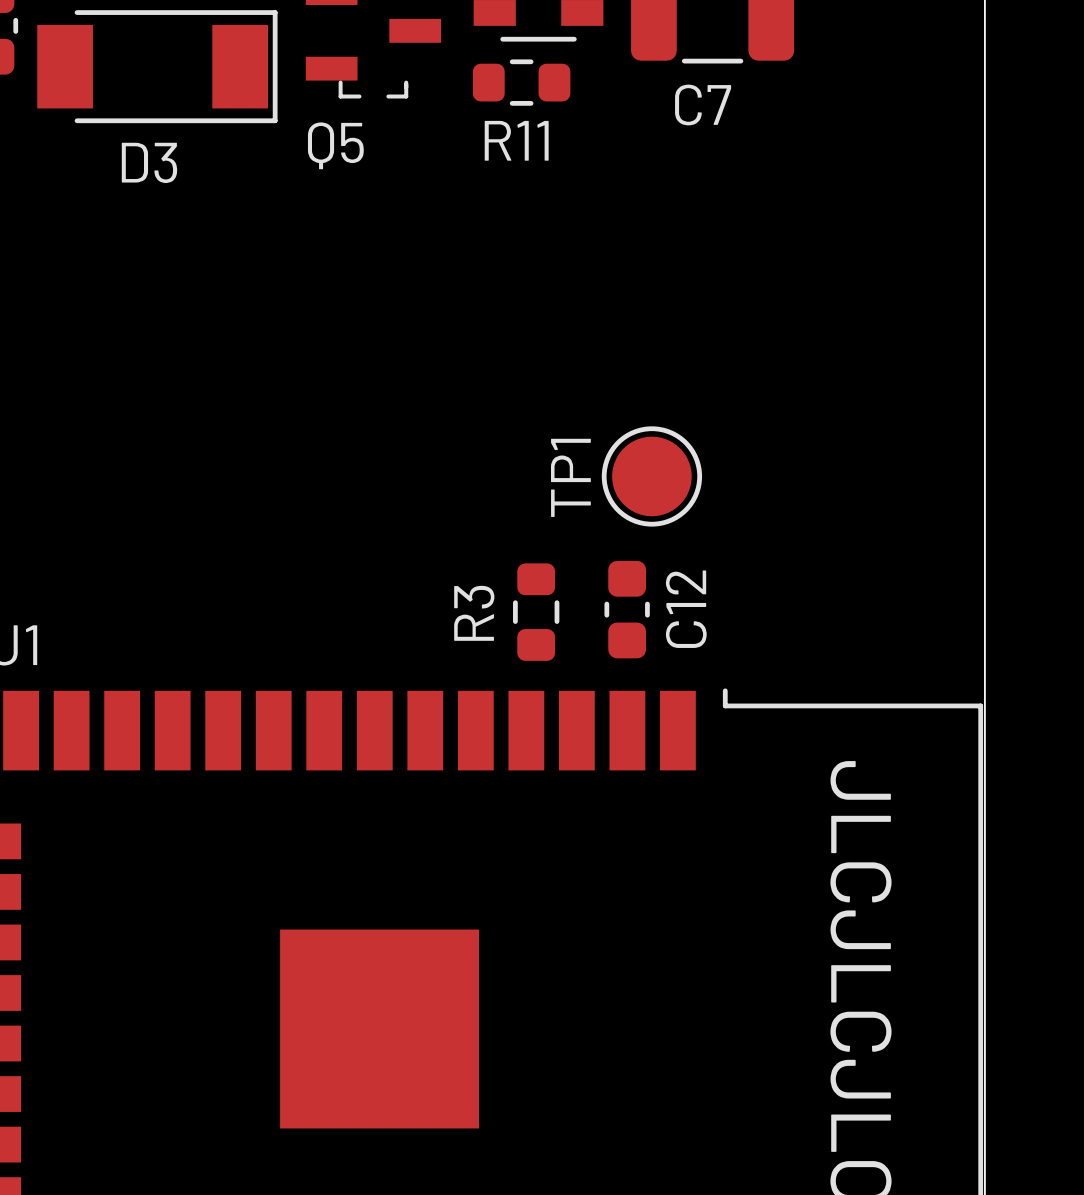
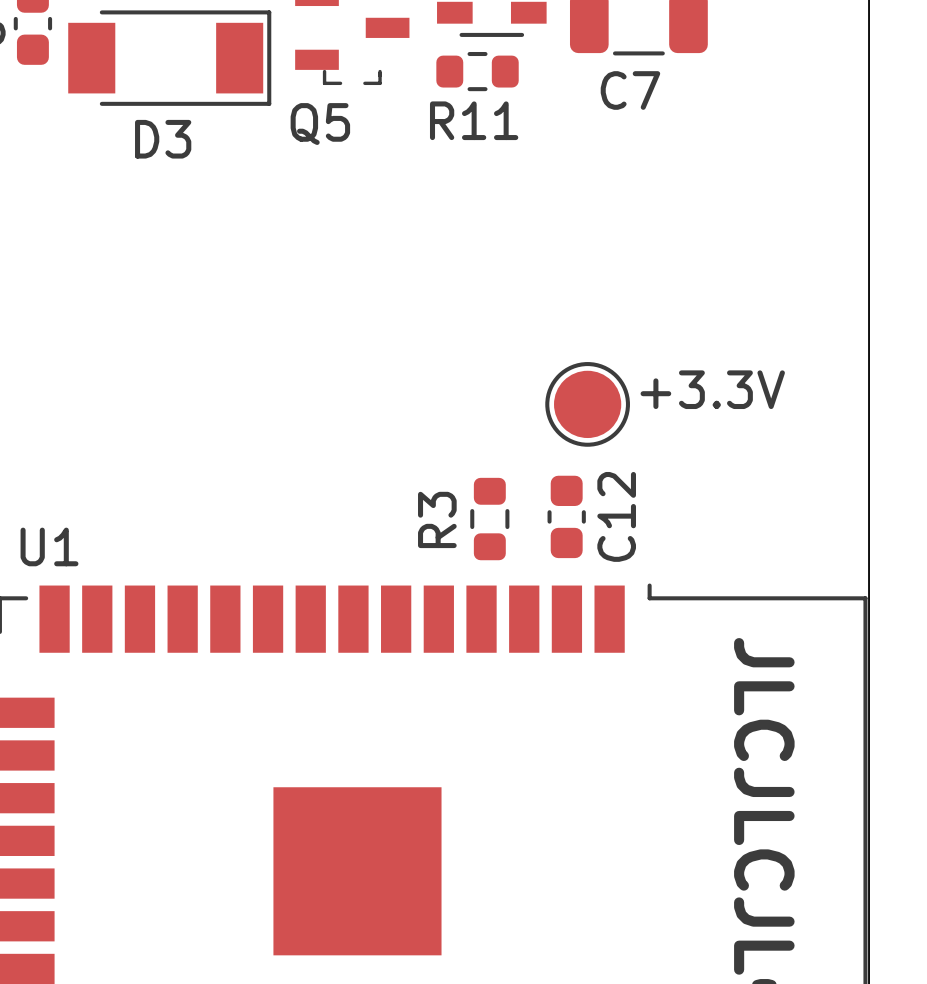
TP1 text: none -> +3.3V (712, 389)
TP1 name: TP1 (570, 477) -> none

